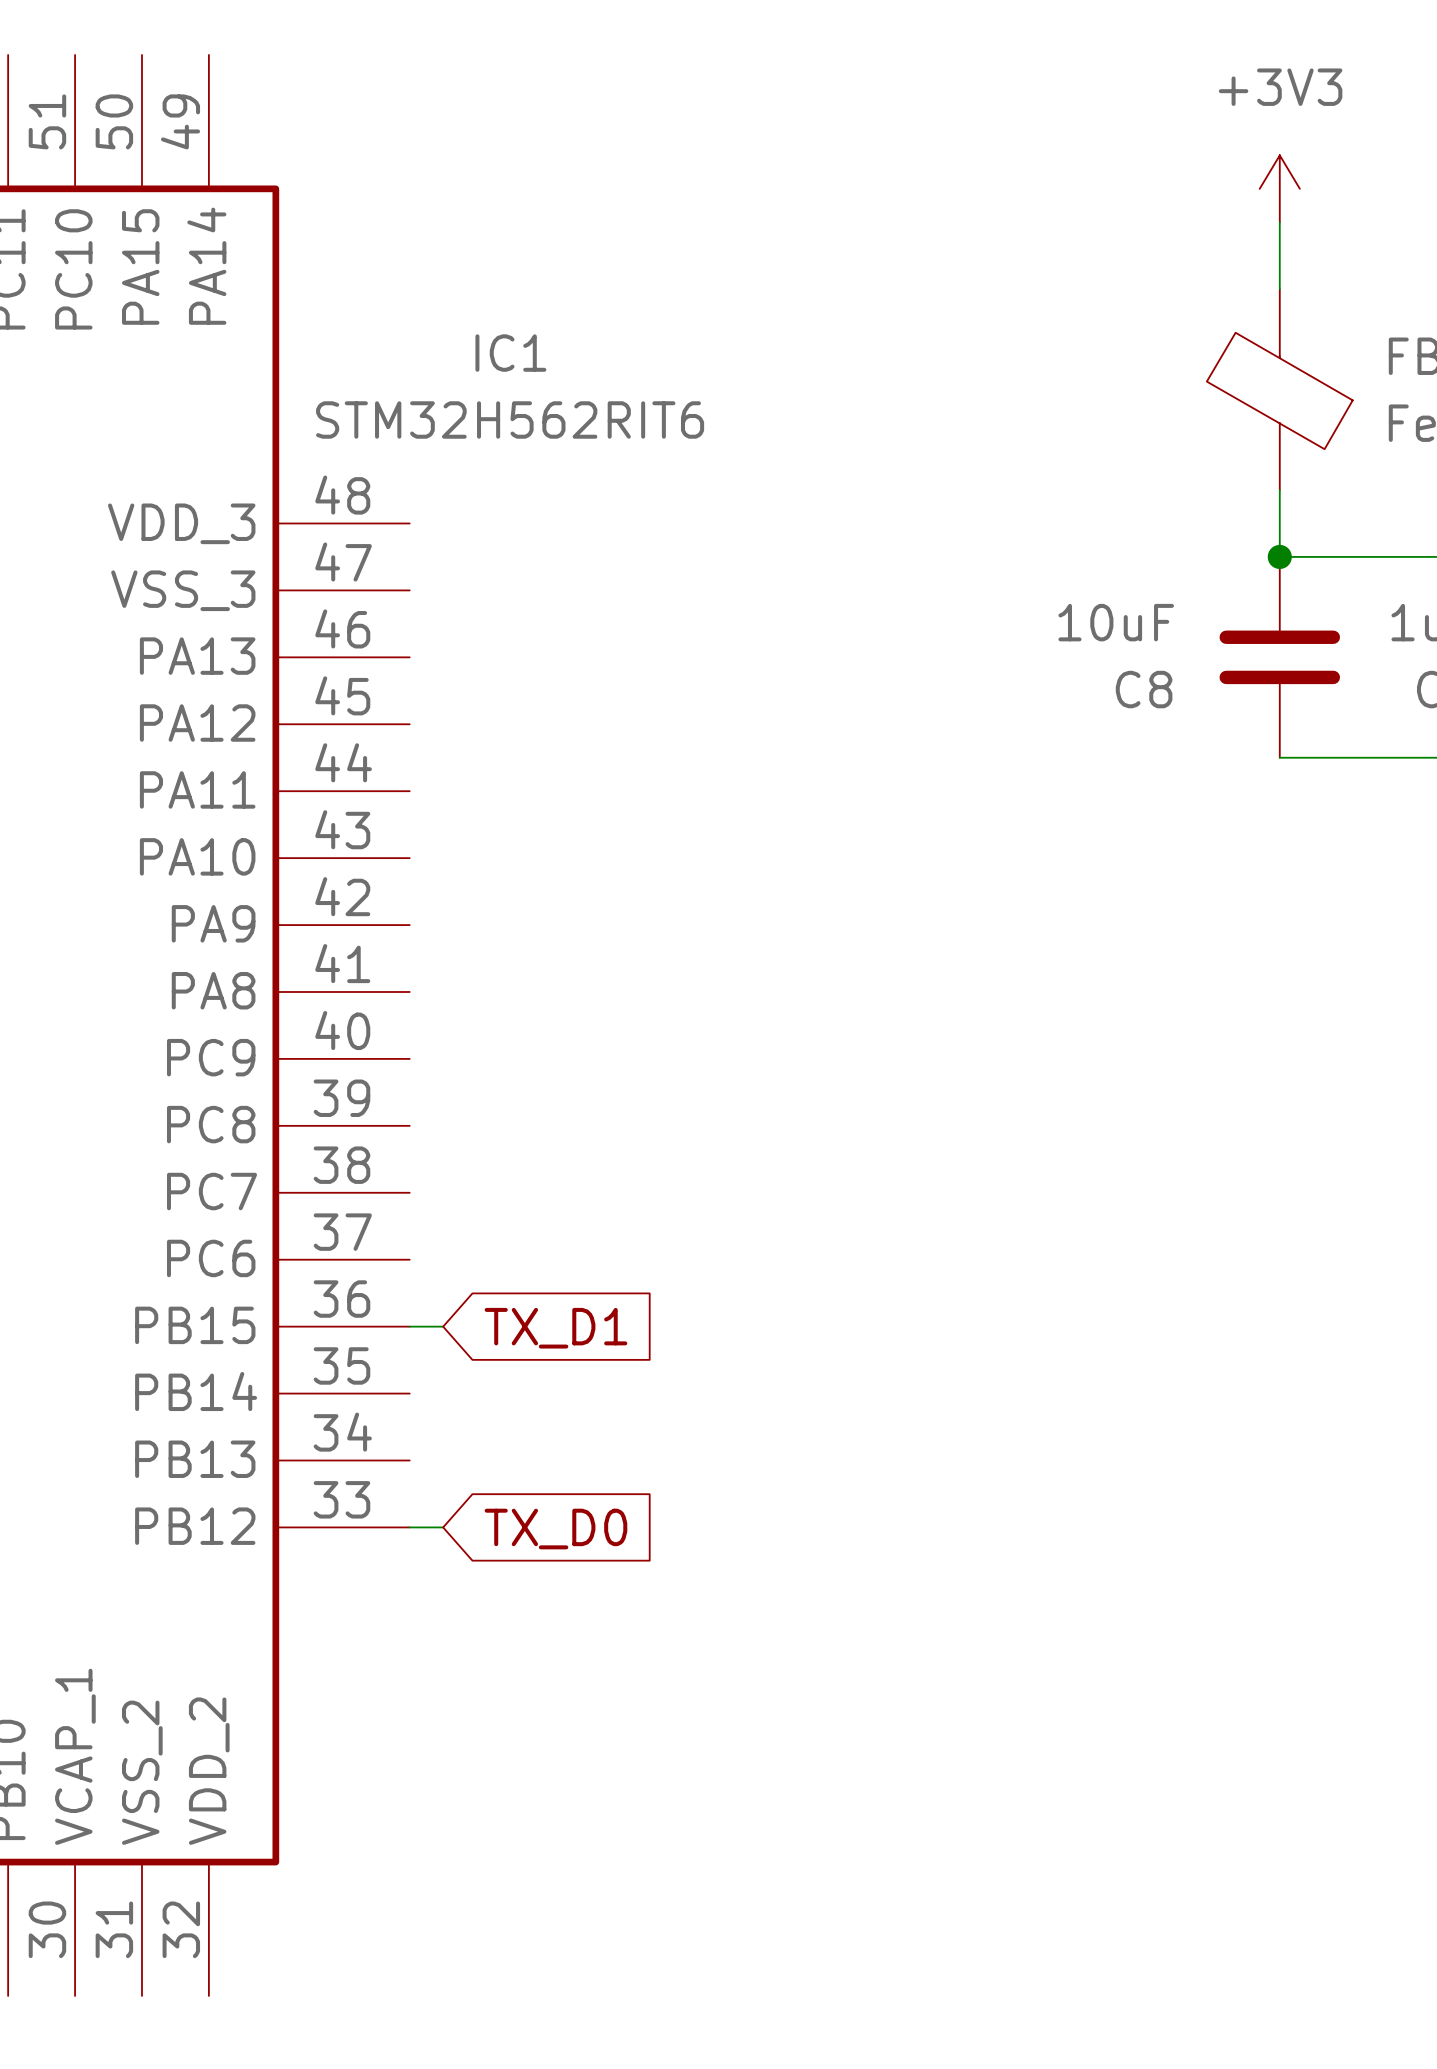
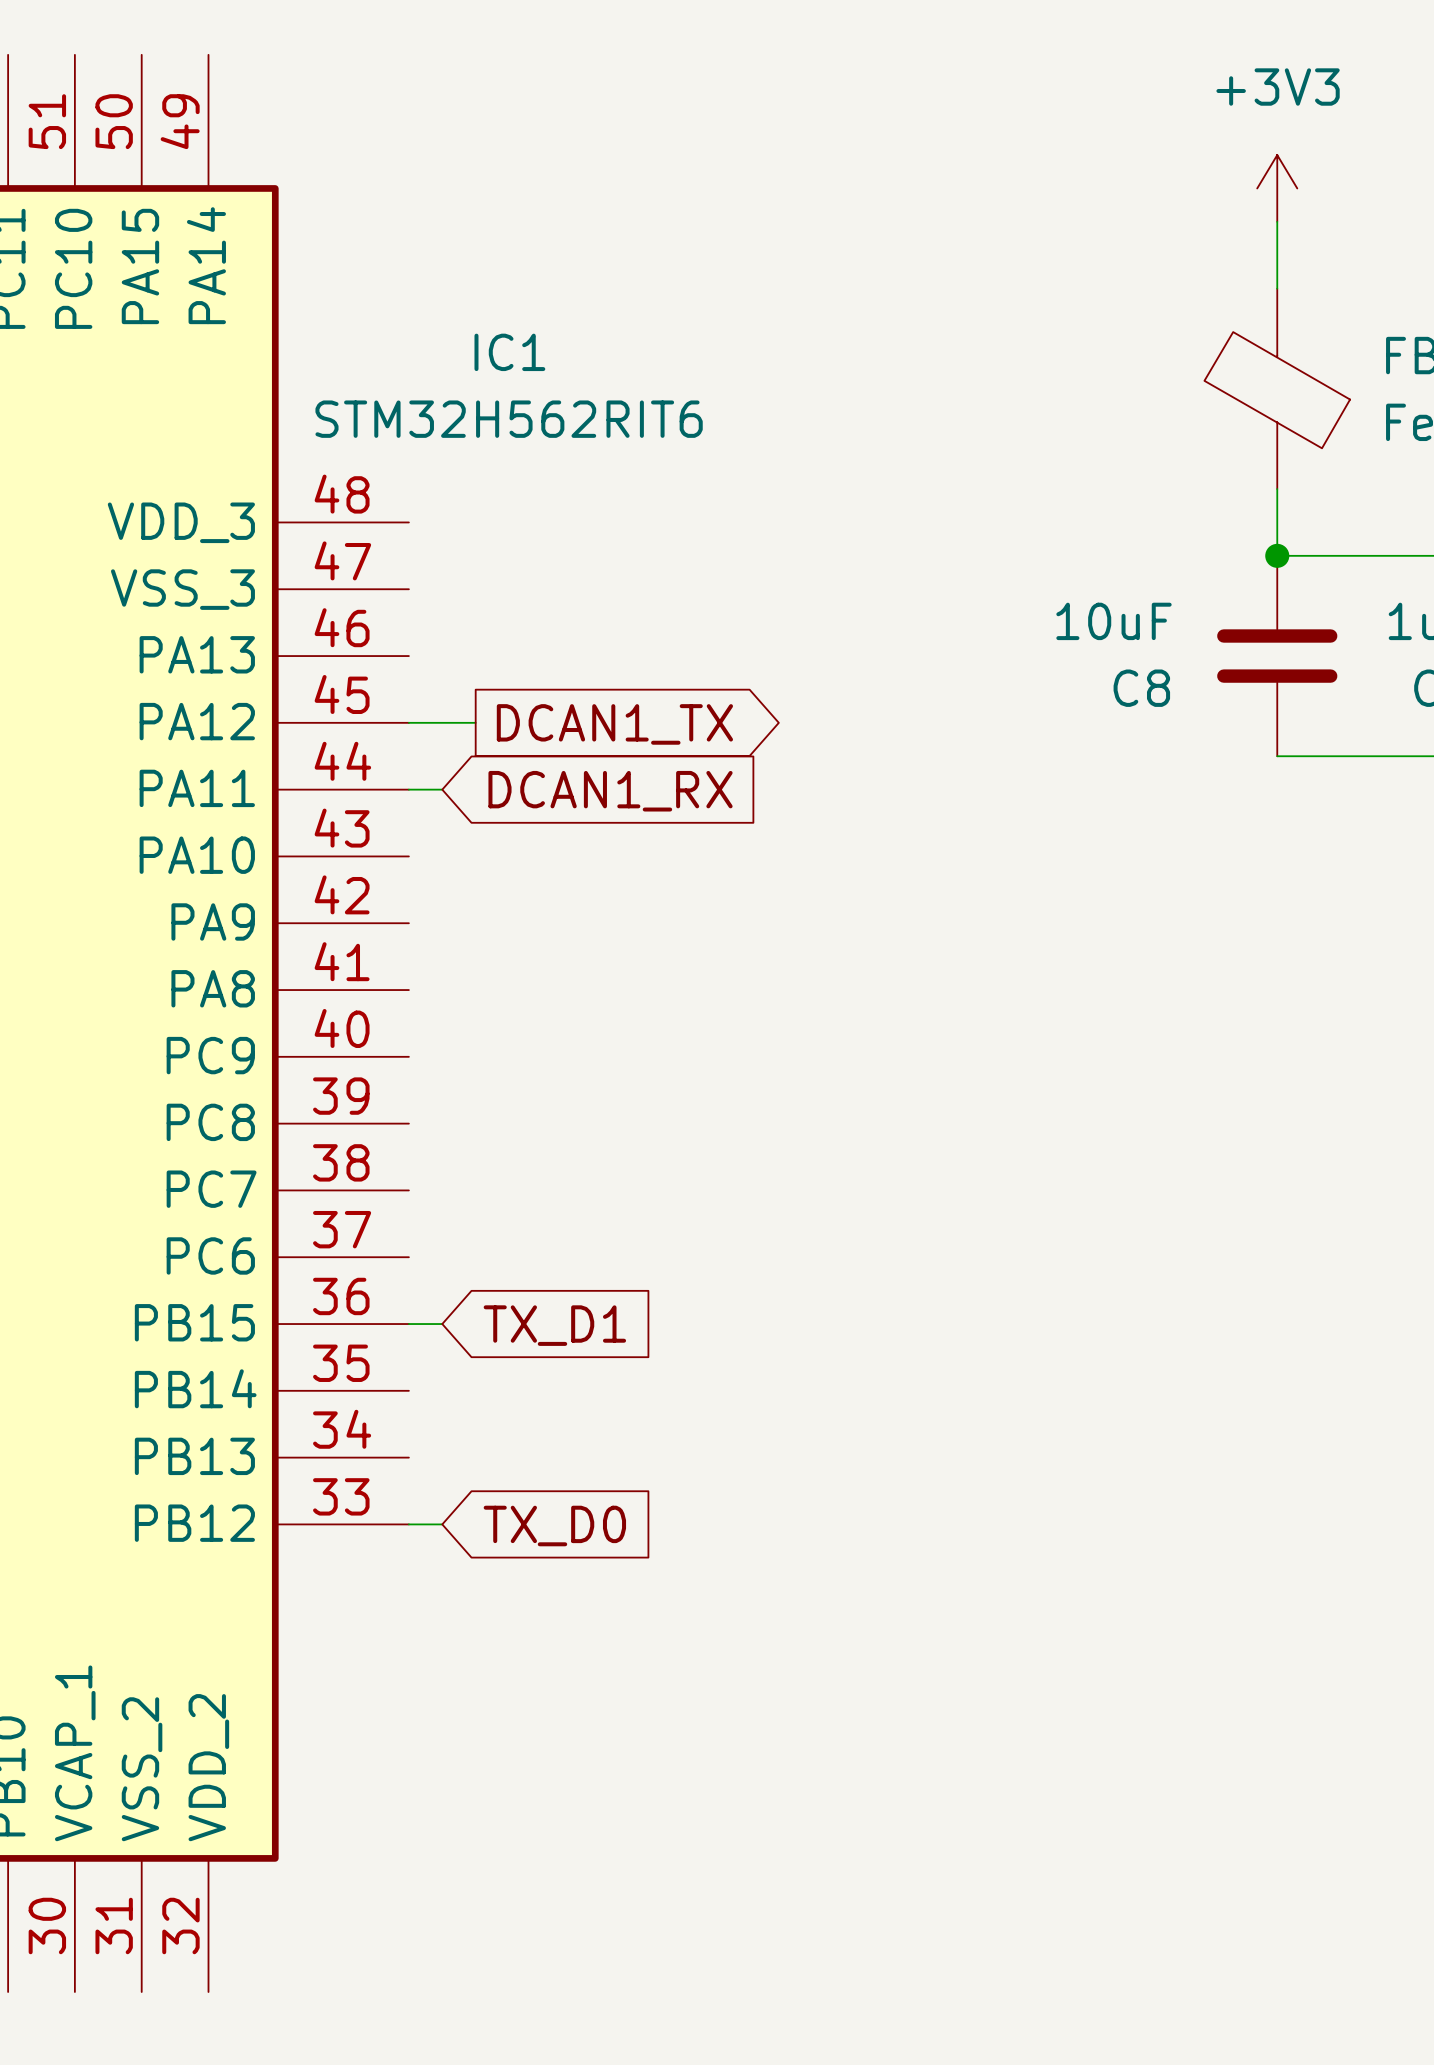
wire: none -> (408, 722) (475, 722)
global label: none -> DCAN1_TX (614, 724)
wire: none -> (408, 789) (442, 789)
global label: none -> DCAN1_RX (610, 791)

